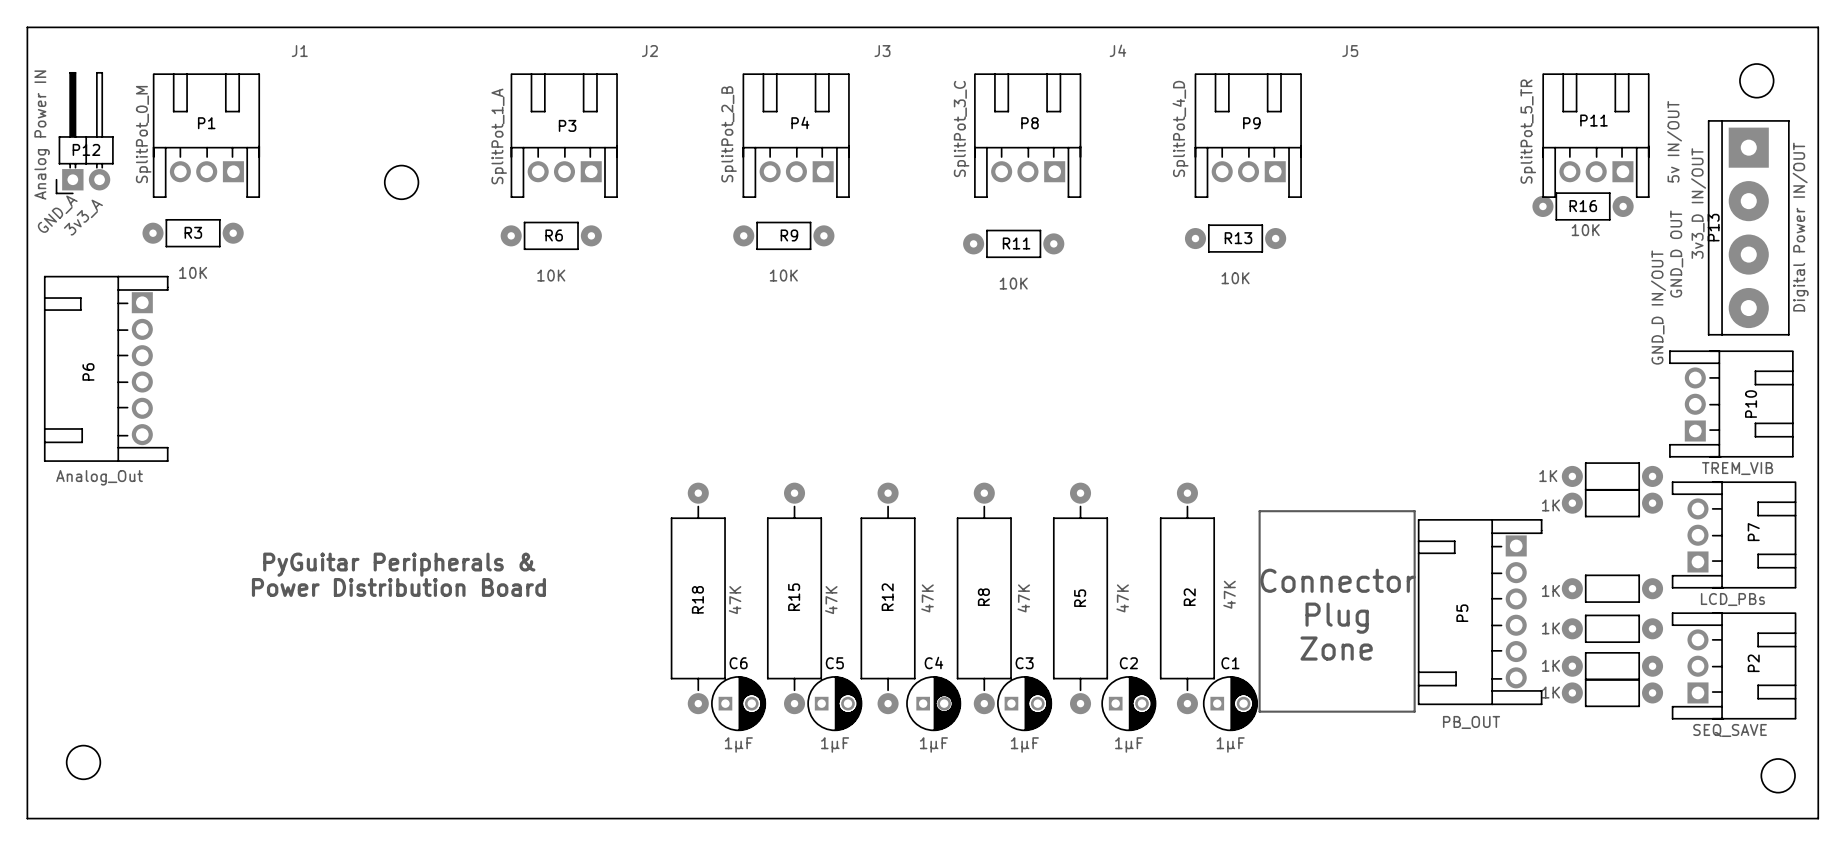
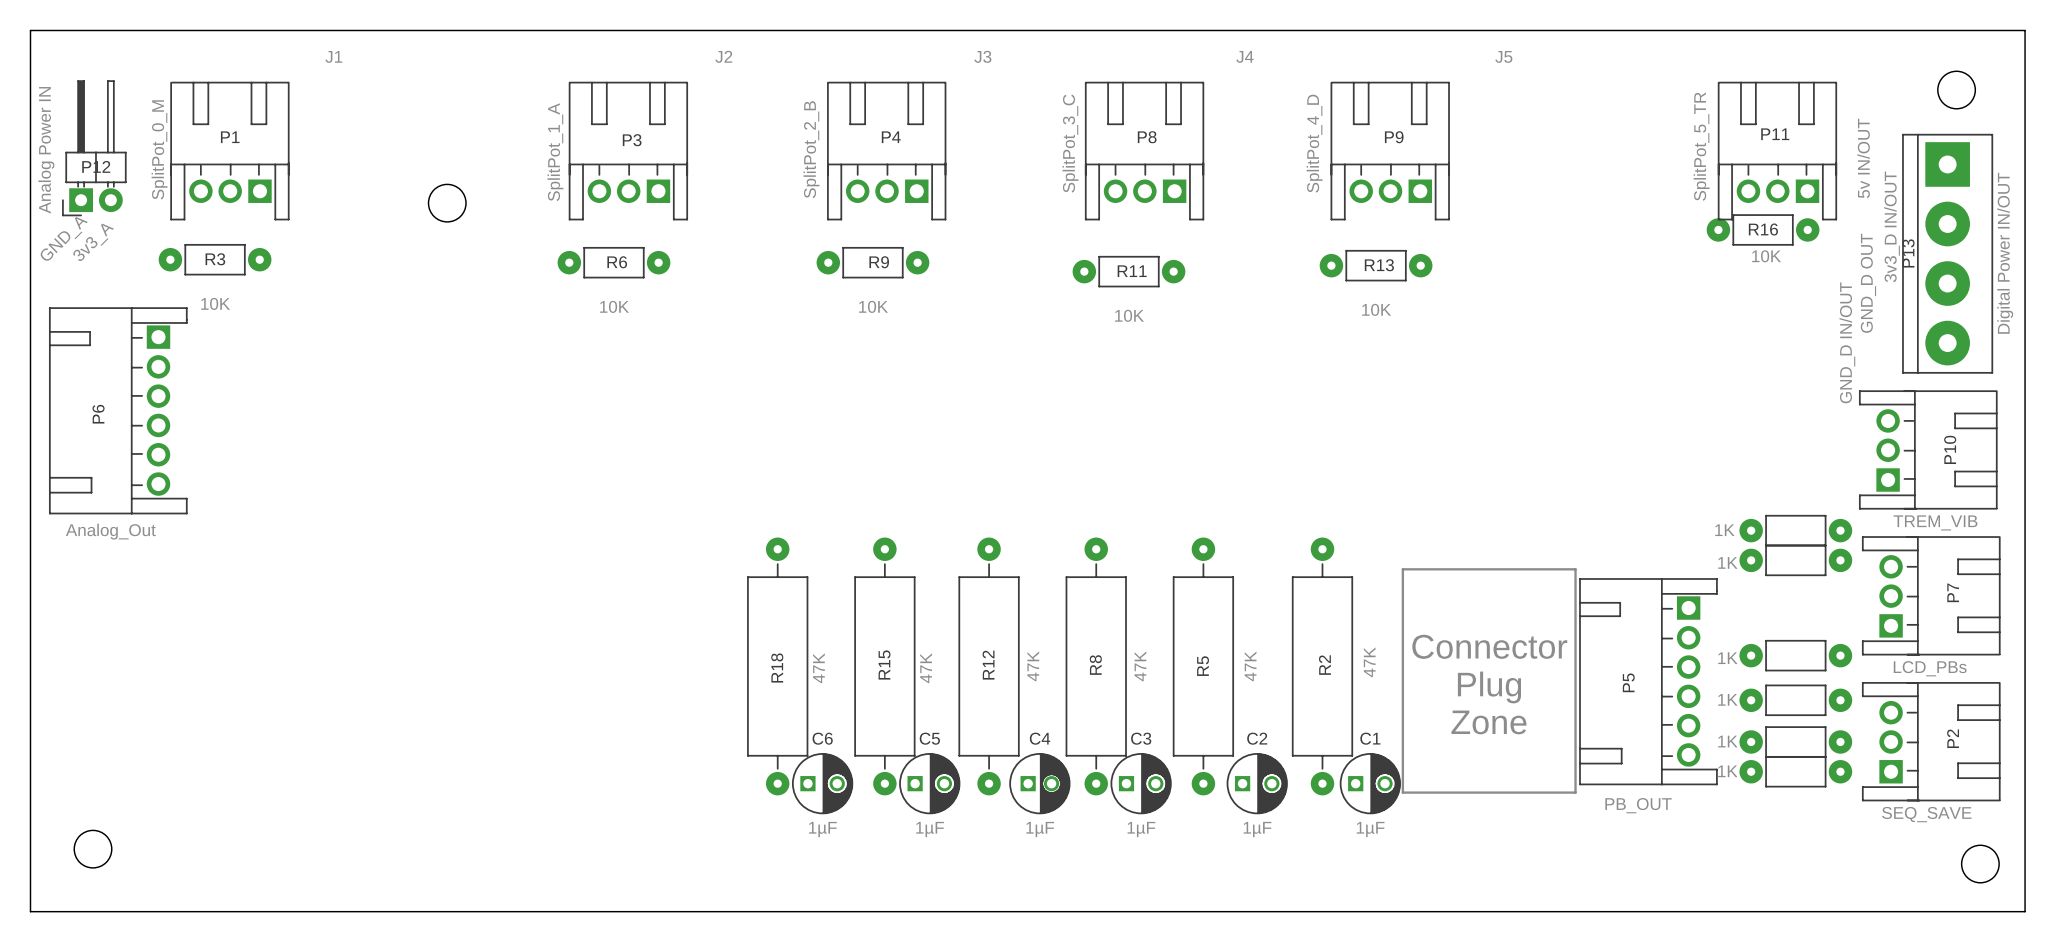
text: PyGuitar Peripherals & (399, 564) -> none
text: Power Distribution Board (398, 587) -> none

